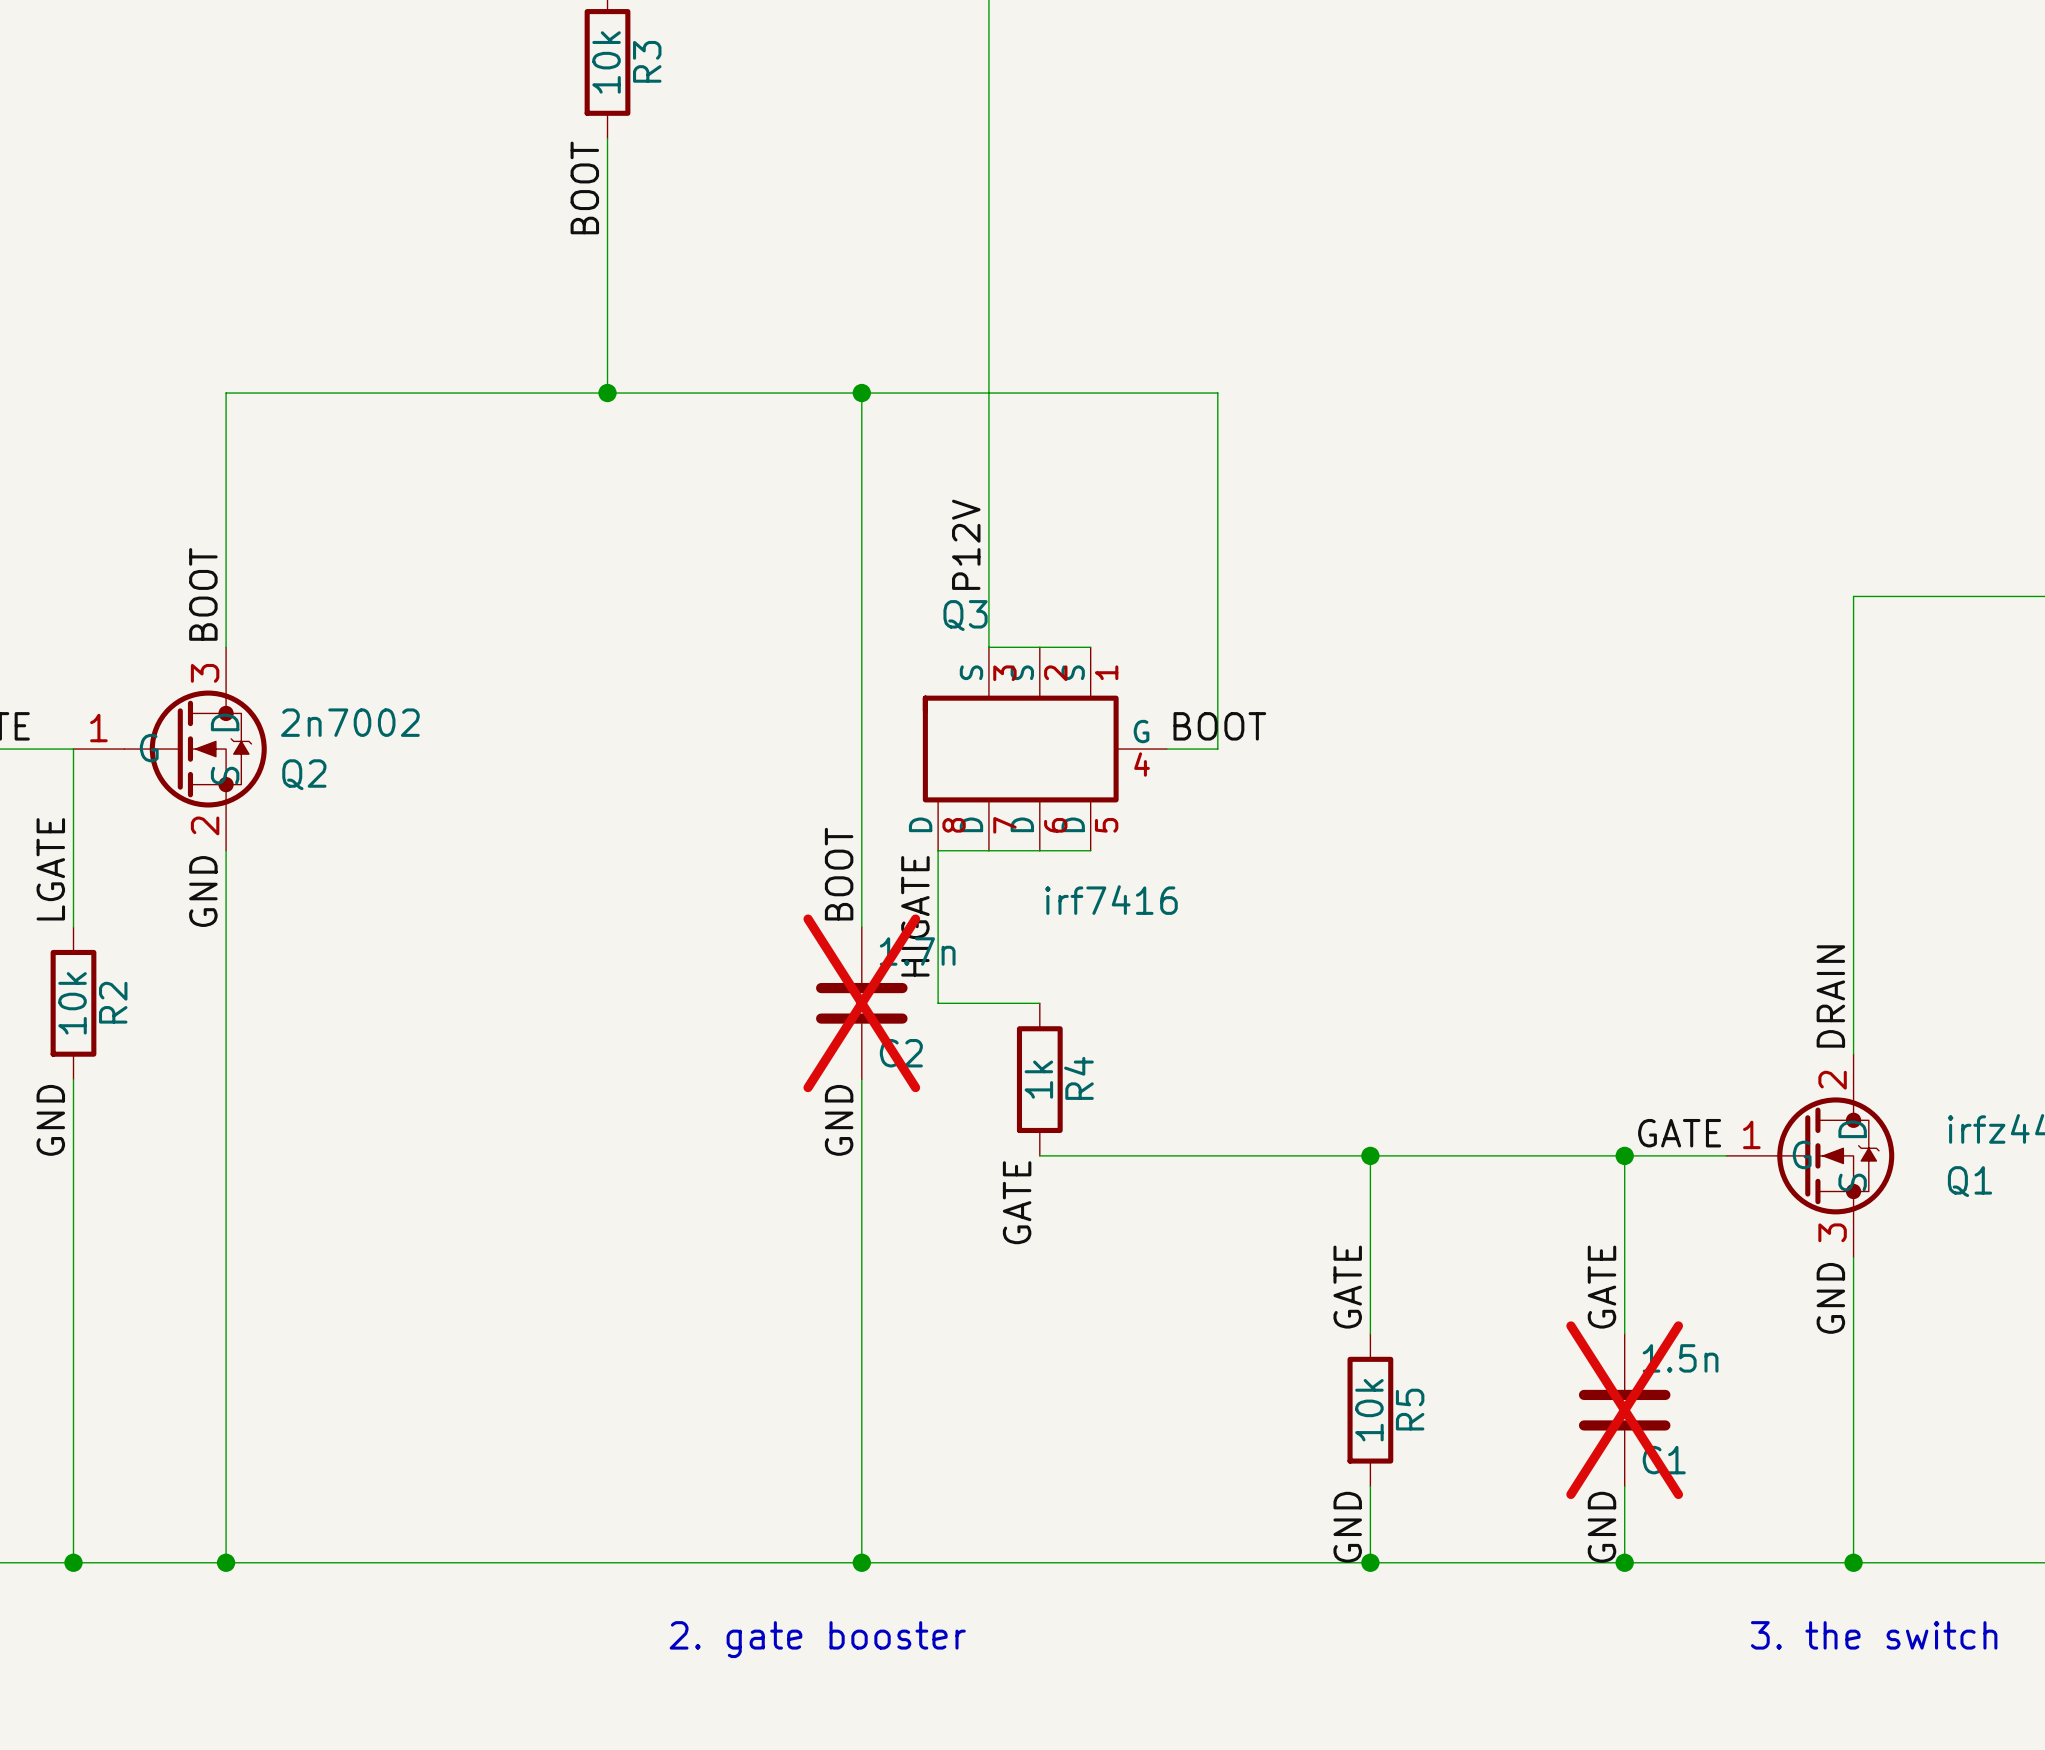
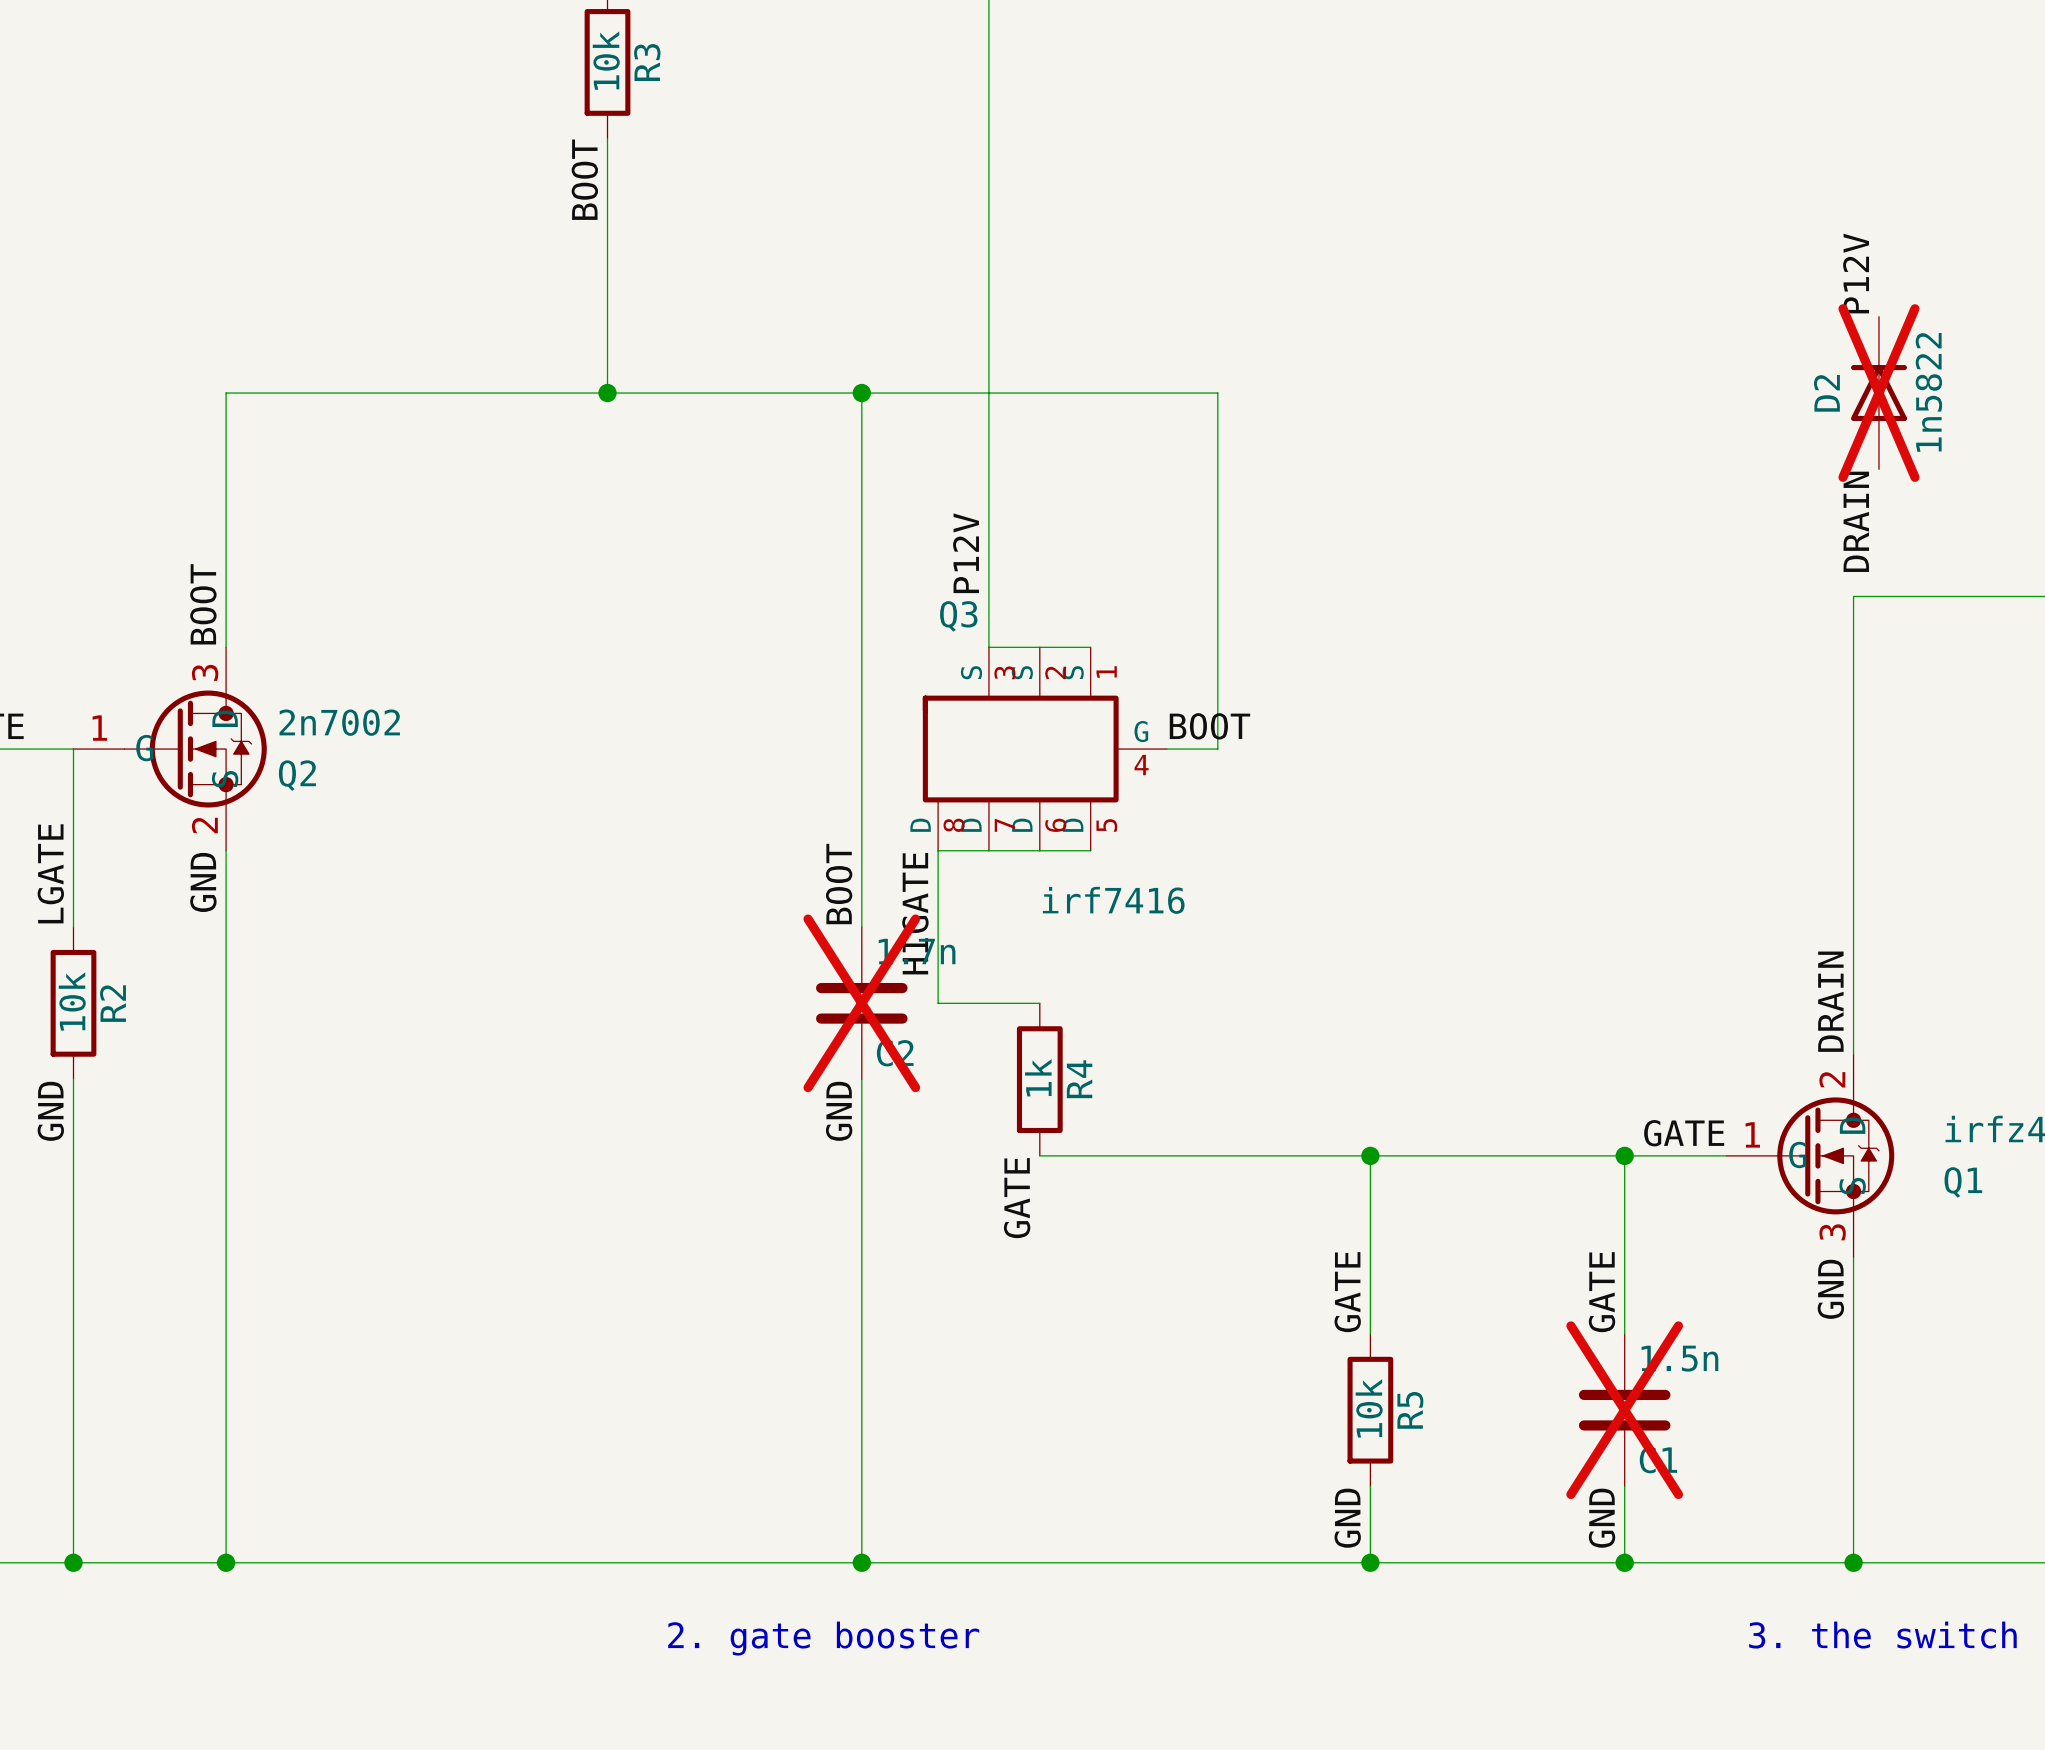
label: none -> P12V (1856, 273)
D2: none -> 1n5822 (1878, 393)
label: none -> DRAIN (1856, 521)

